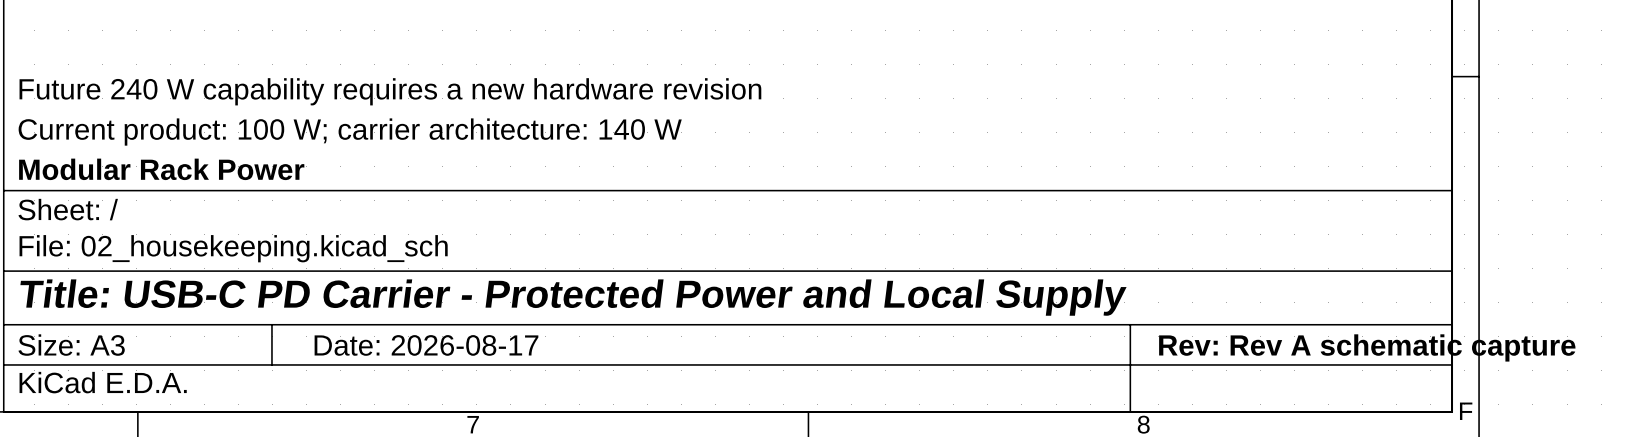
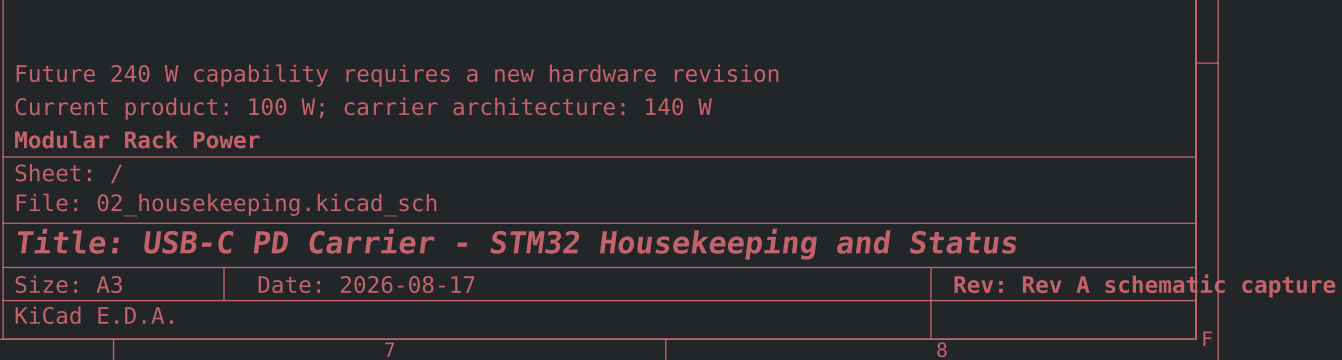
title block: Title: USB-C PD Carrier - Protected Power and Local Supply (573, 297) -> Title: USB-C PD Carrier - STM32 Housekeeping and Status (516, 244)

